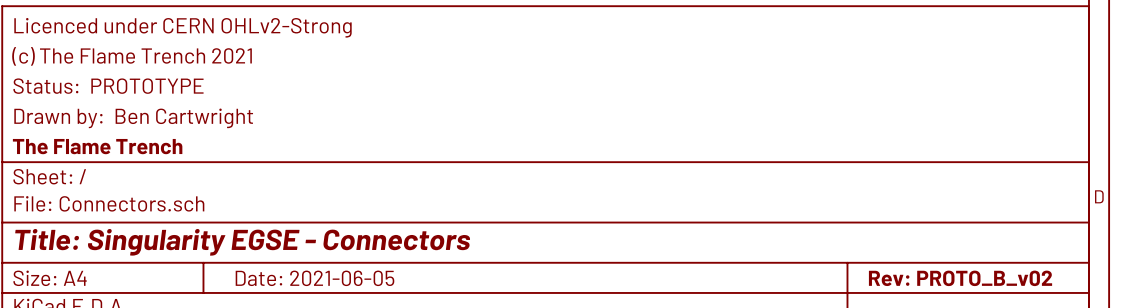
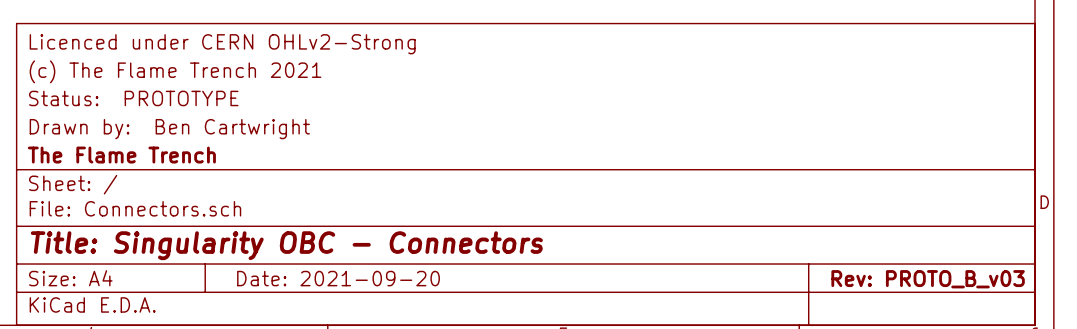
title block: Title: Singularity EGSE - Connectors (242, 242) -> Title: Singularity OBC - Connectors (286, 245)
title block: Date: 2021-06-05 (314, 278) -> Date: 2021-09-20 (338, 278)
title block: Rev: PROTO_B_v02 (960, 278) -> Rev: PROTO_B_v03 (928, 279)

